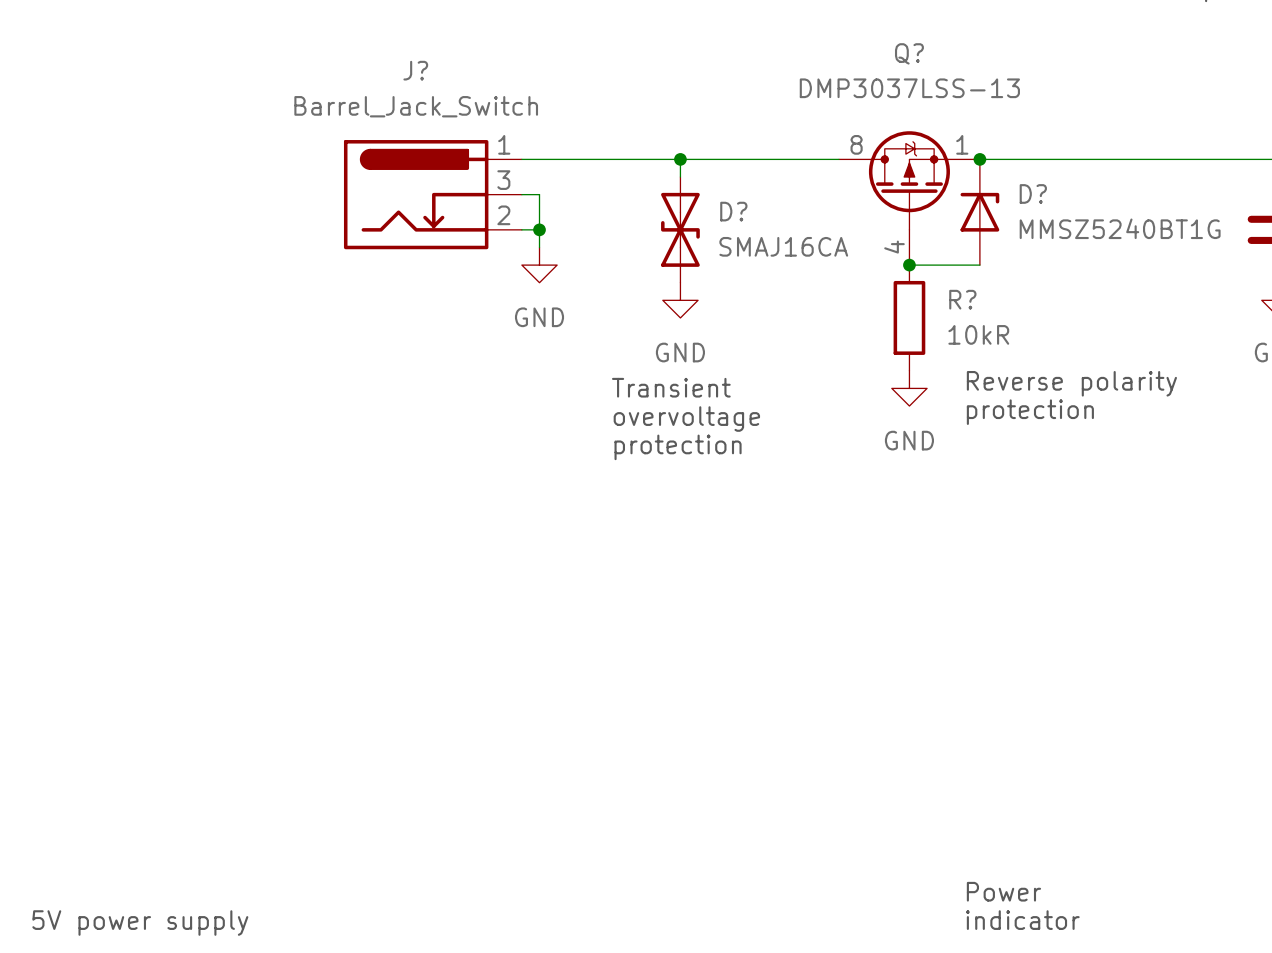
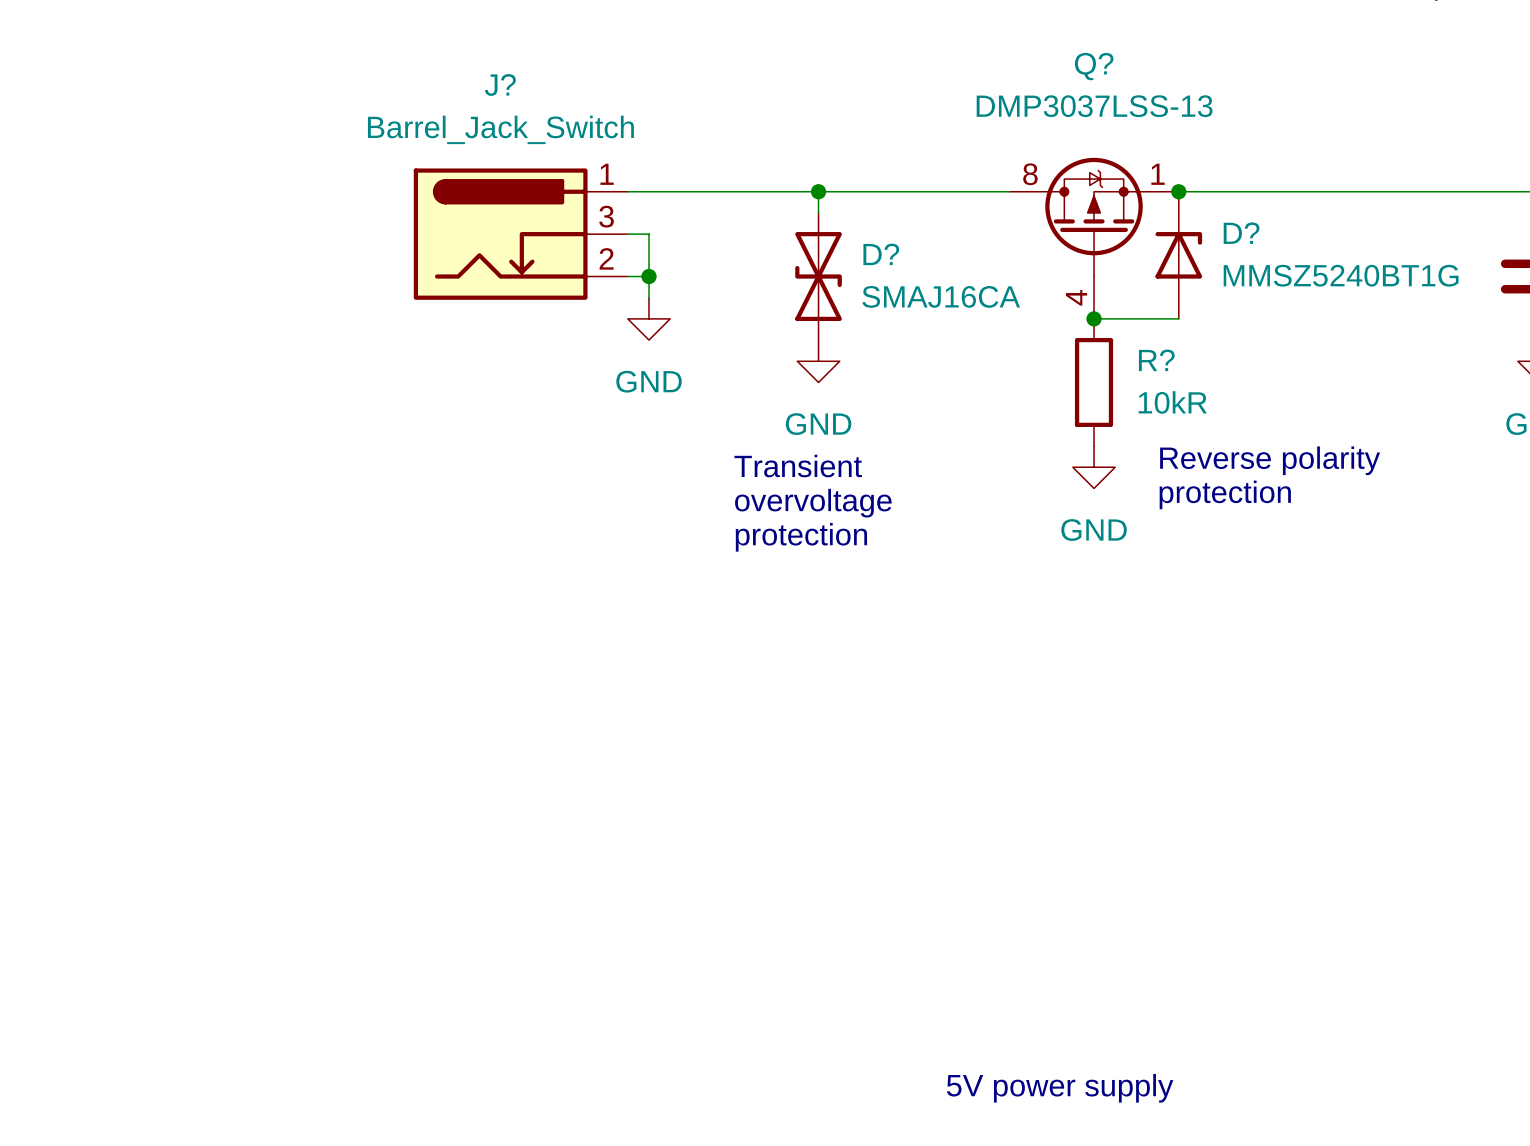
text: Power (1003, 891) -> none
text: none -> 5V power supply (1060, 1088)
text: indicator (1022, 920) -> none
text: 5V power supply (140, 923) -> none

